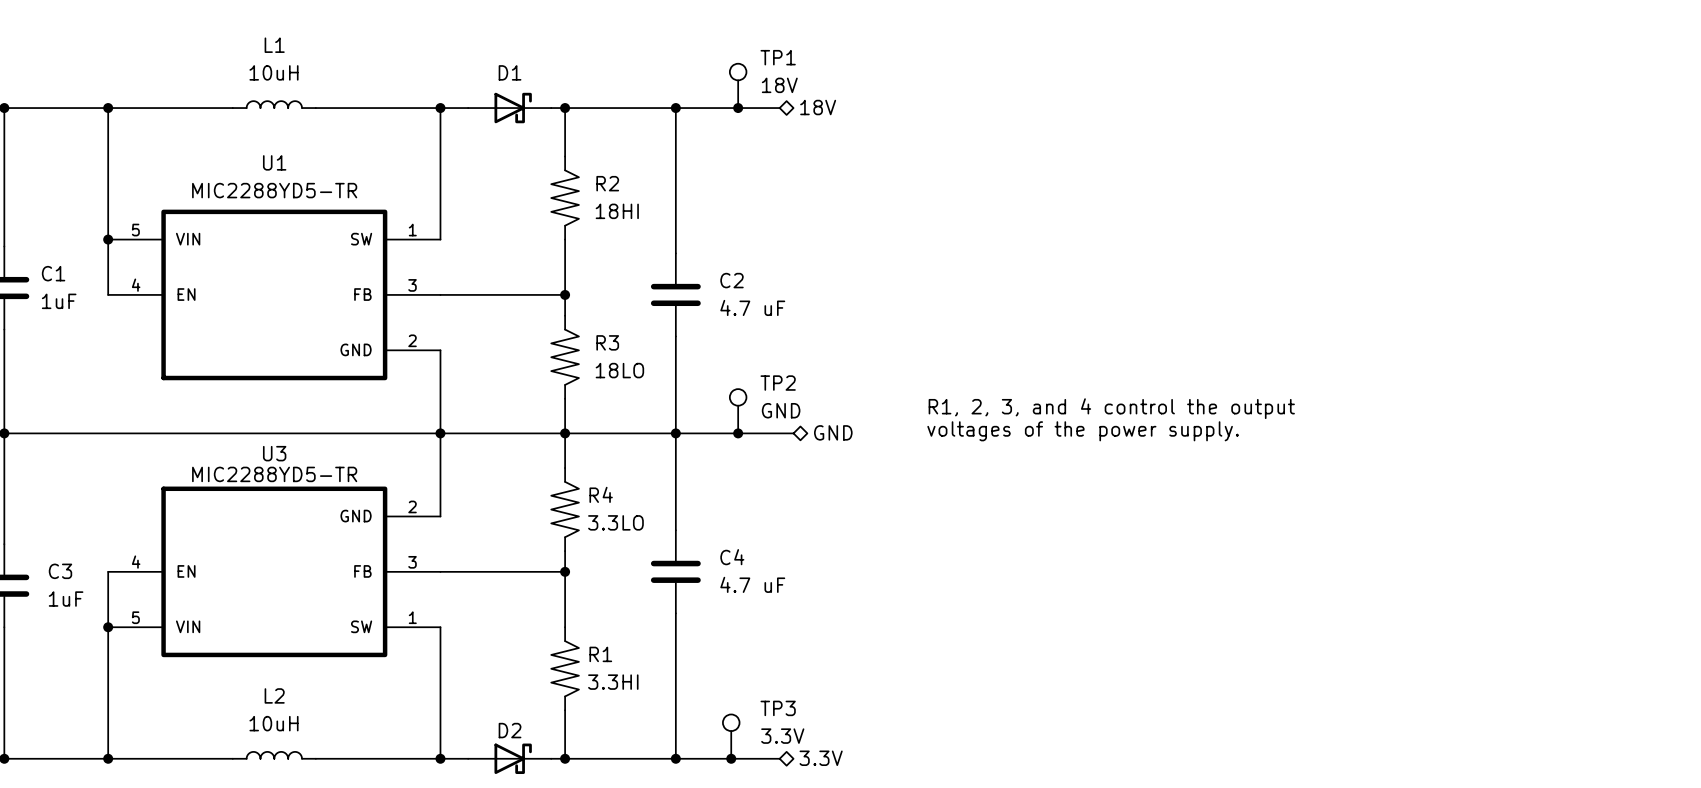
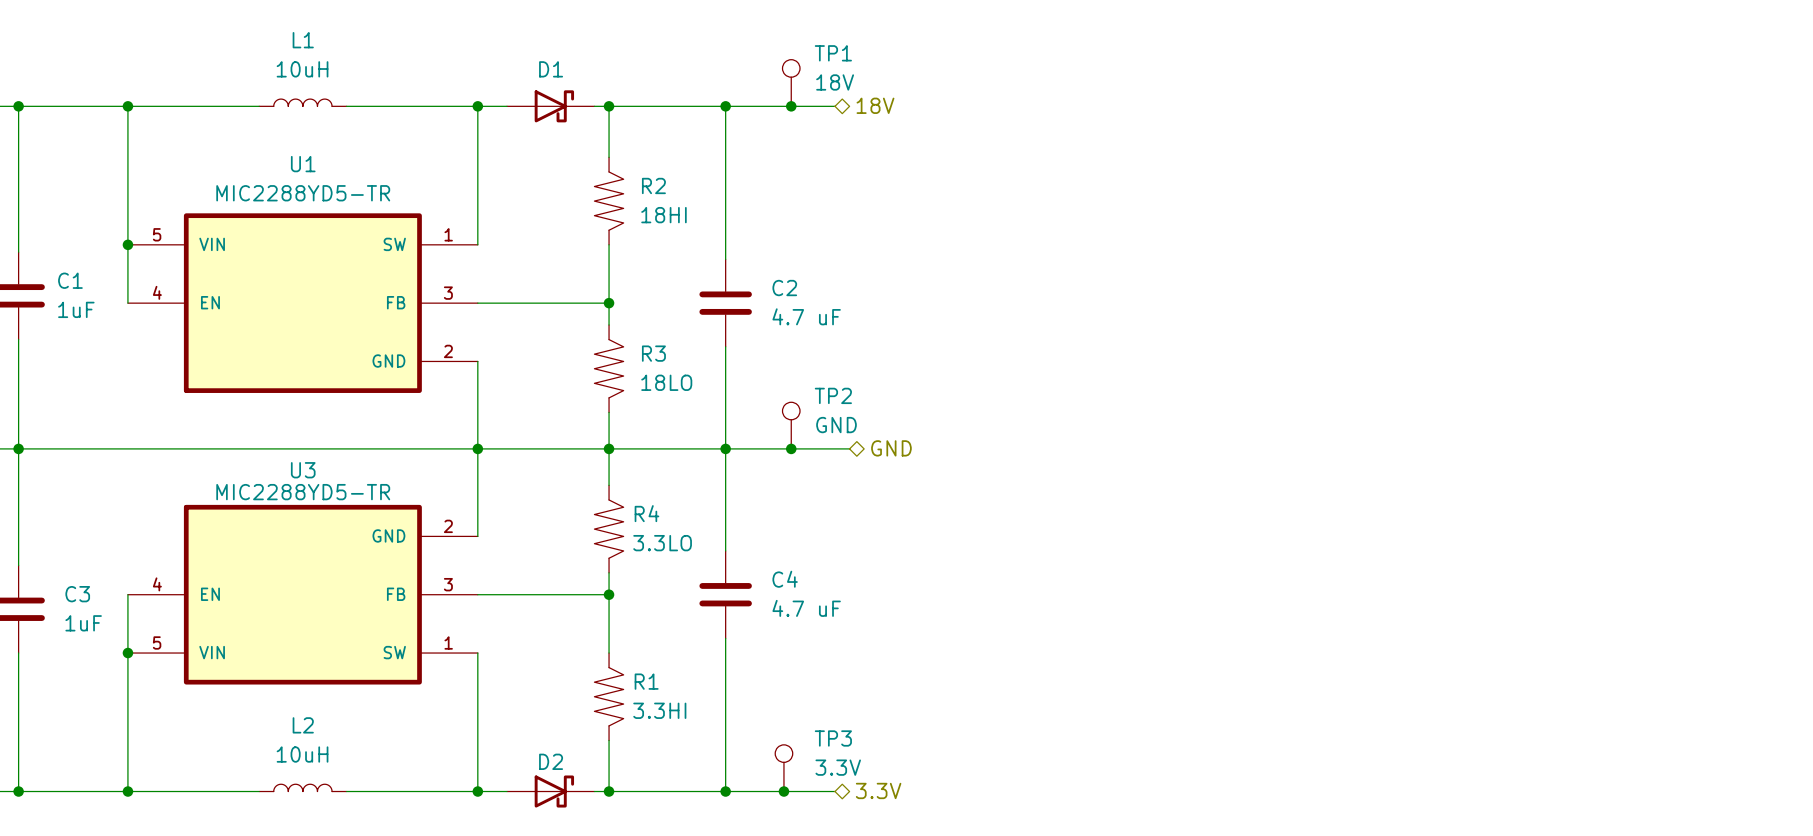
text: R1, 2, 3, and 4 control the output (1111, 408) -> none
text: voltages of the power supply. (1083, 431) -> none

